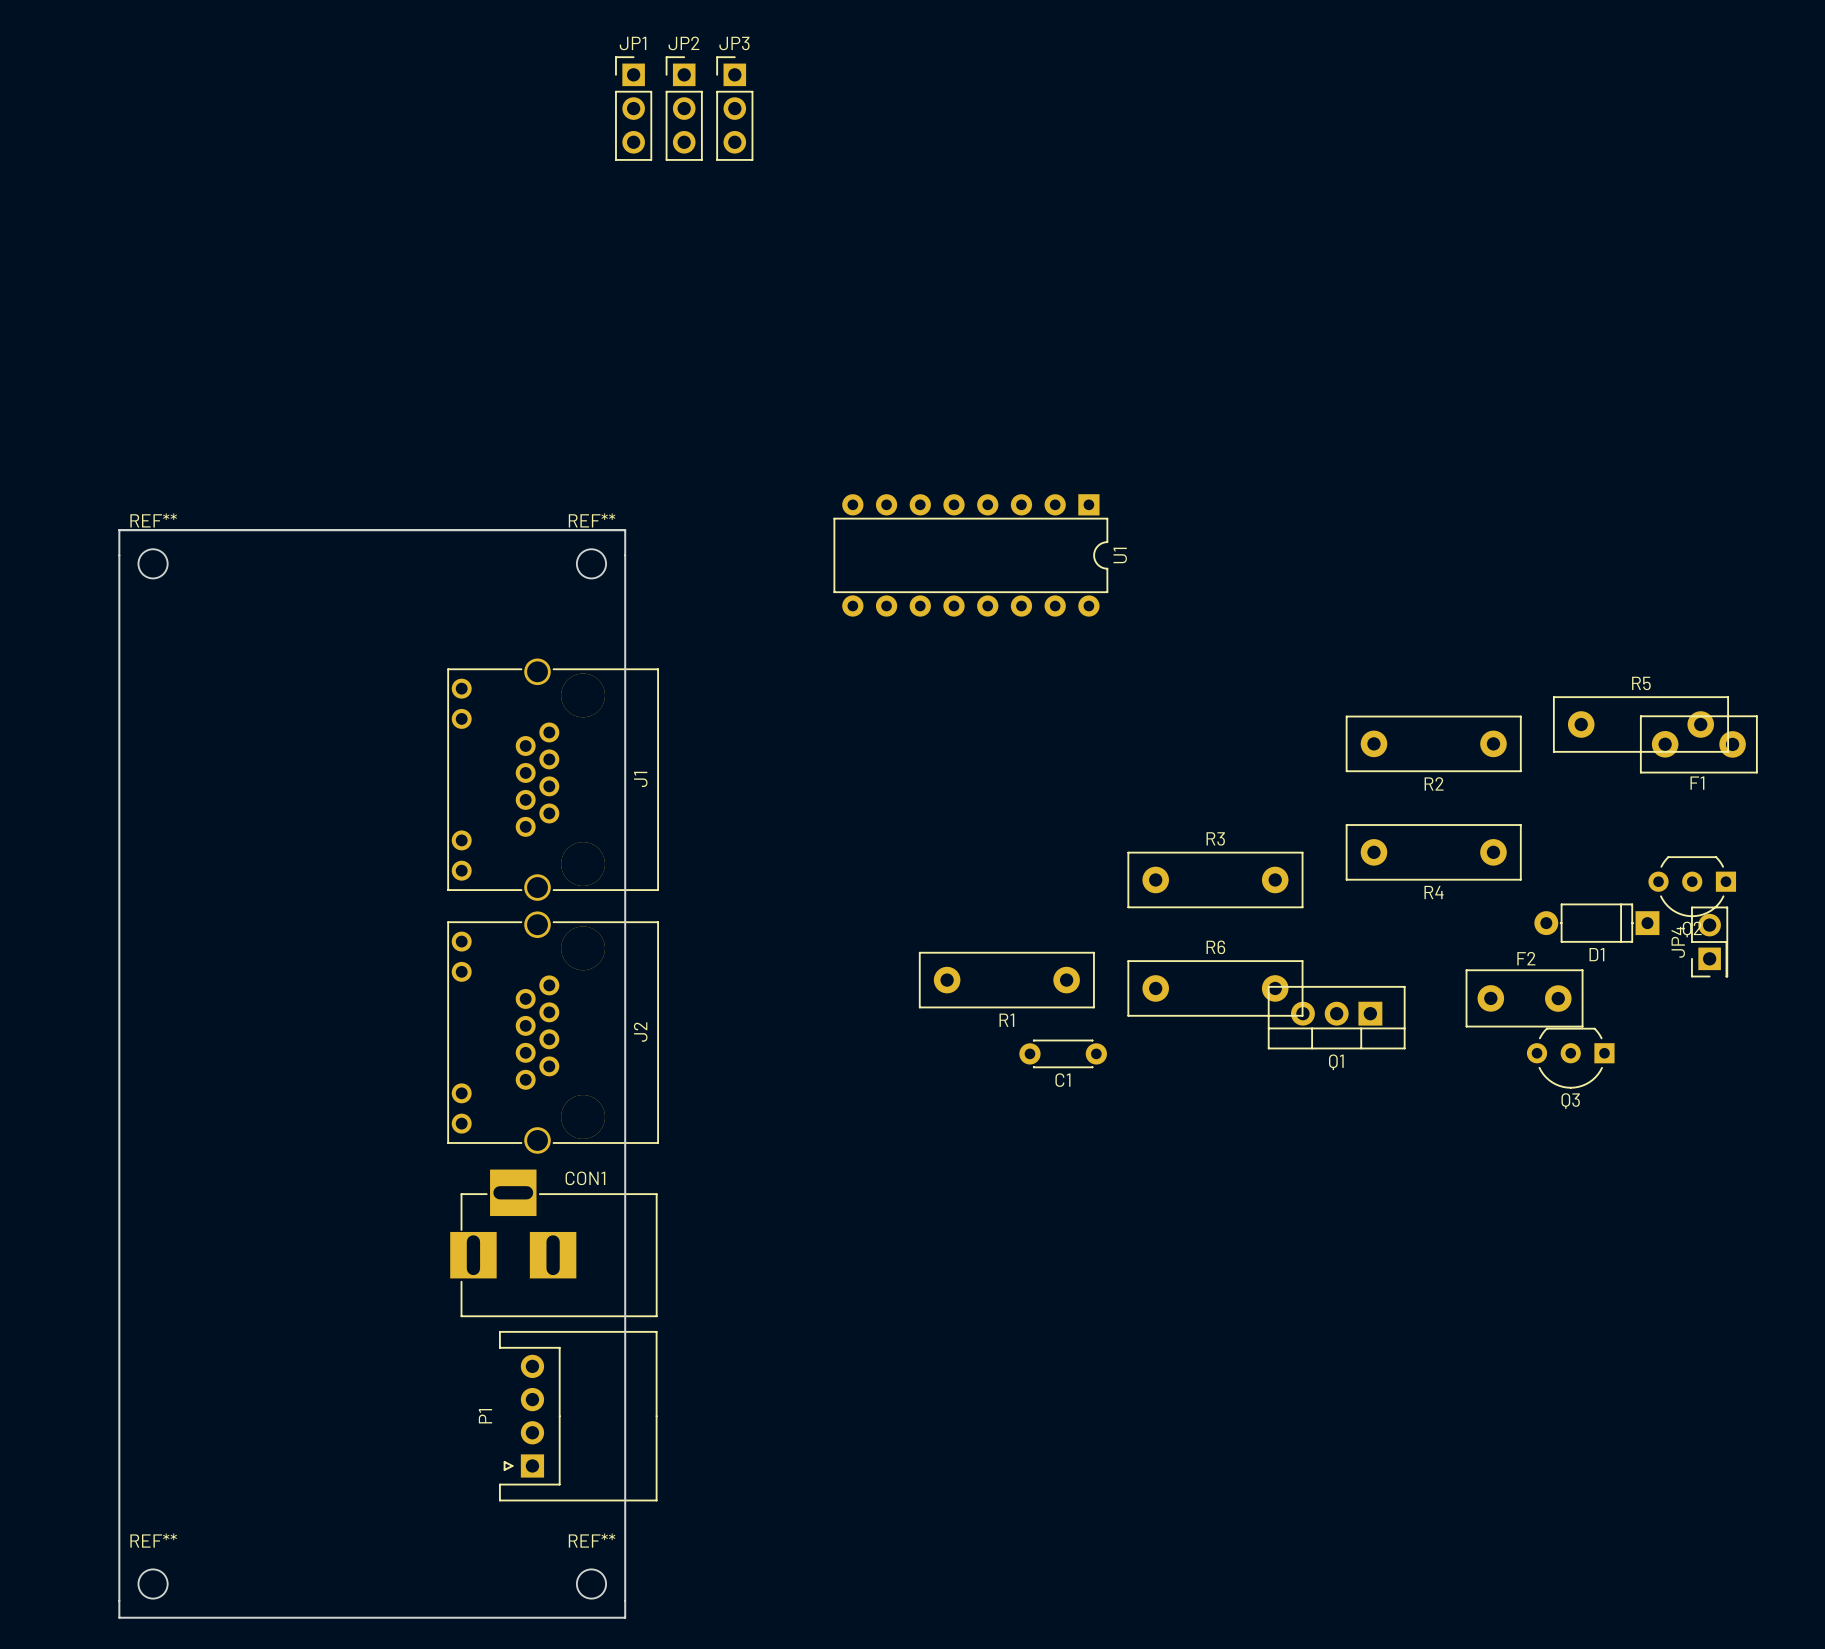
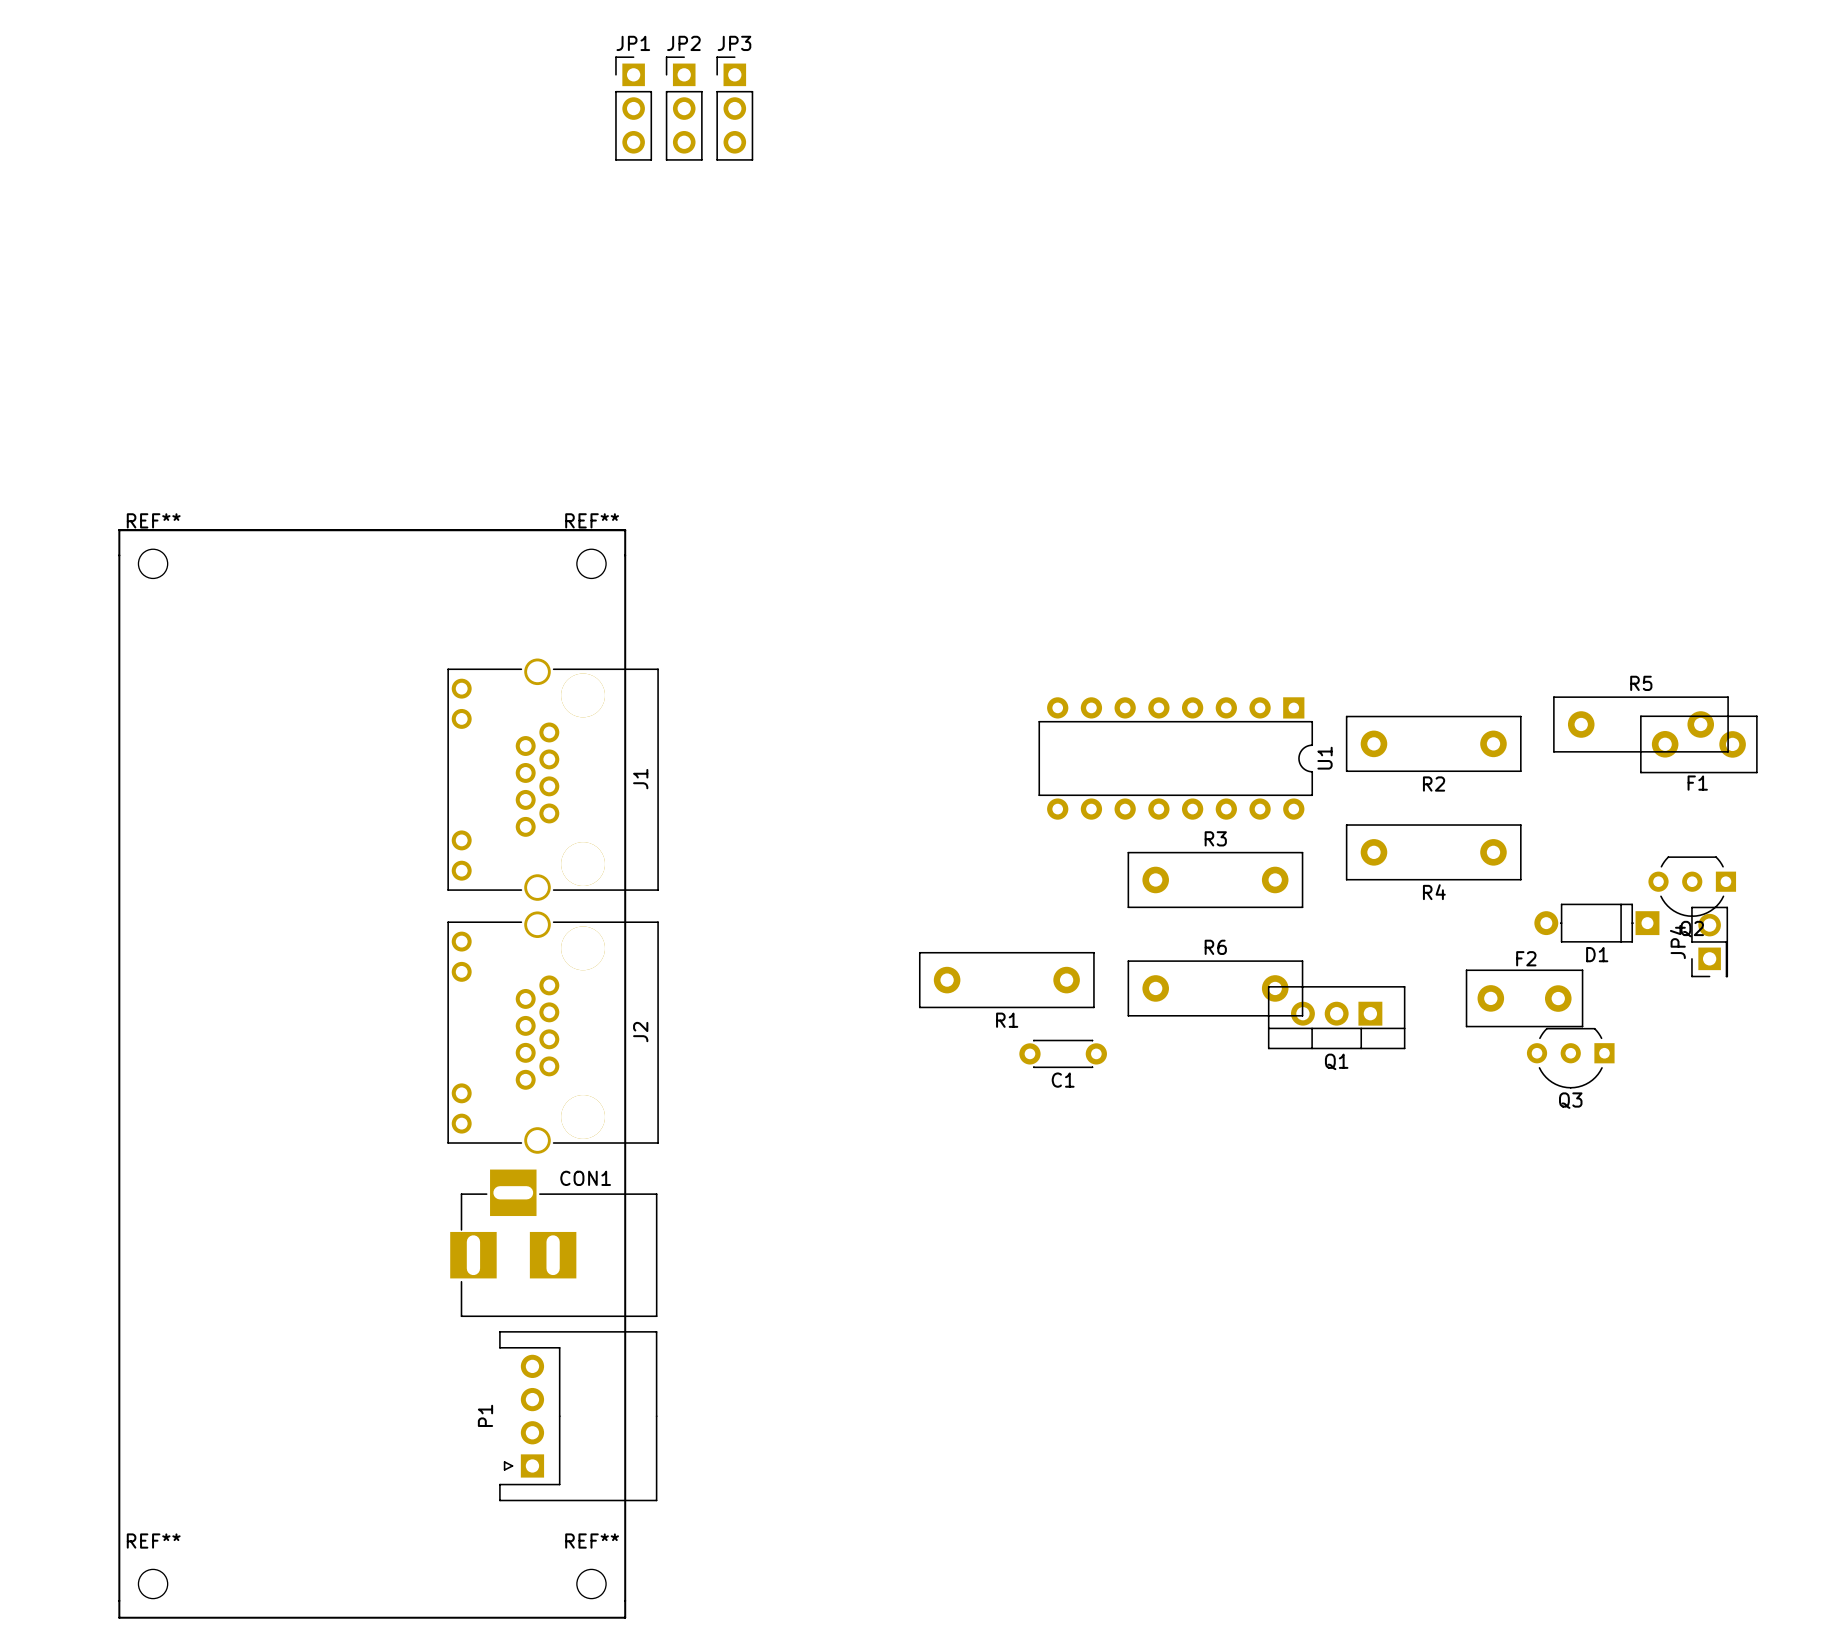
U1 position: (970, 555) -> (1175, 758)

